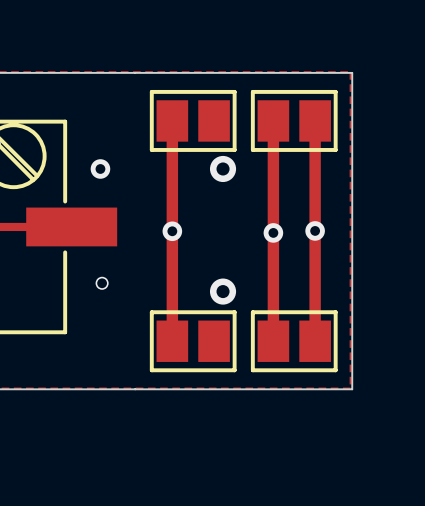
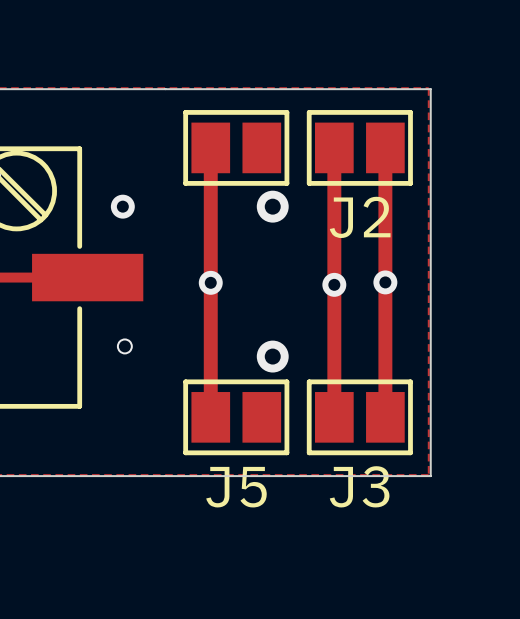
J2 name: none -> J2 (360, 217)
J5 name: none -> J5 (236, 487)
J3 name: none -> J3 (359, 486)

